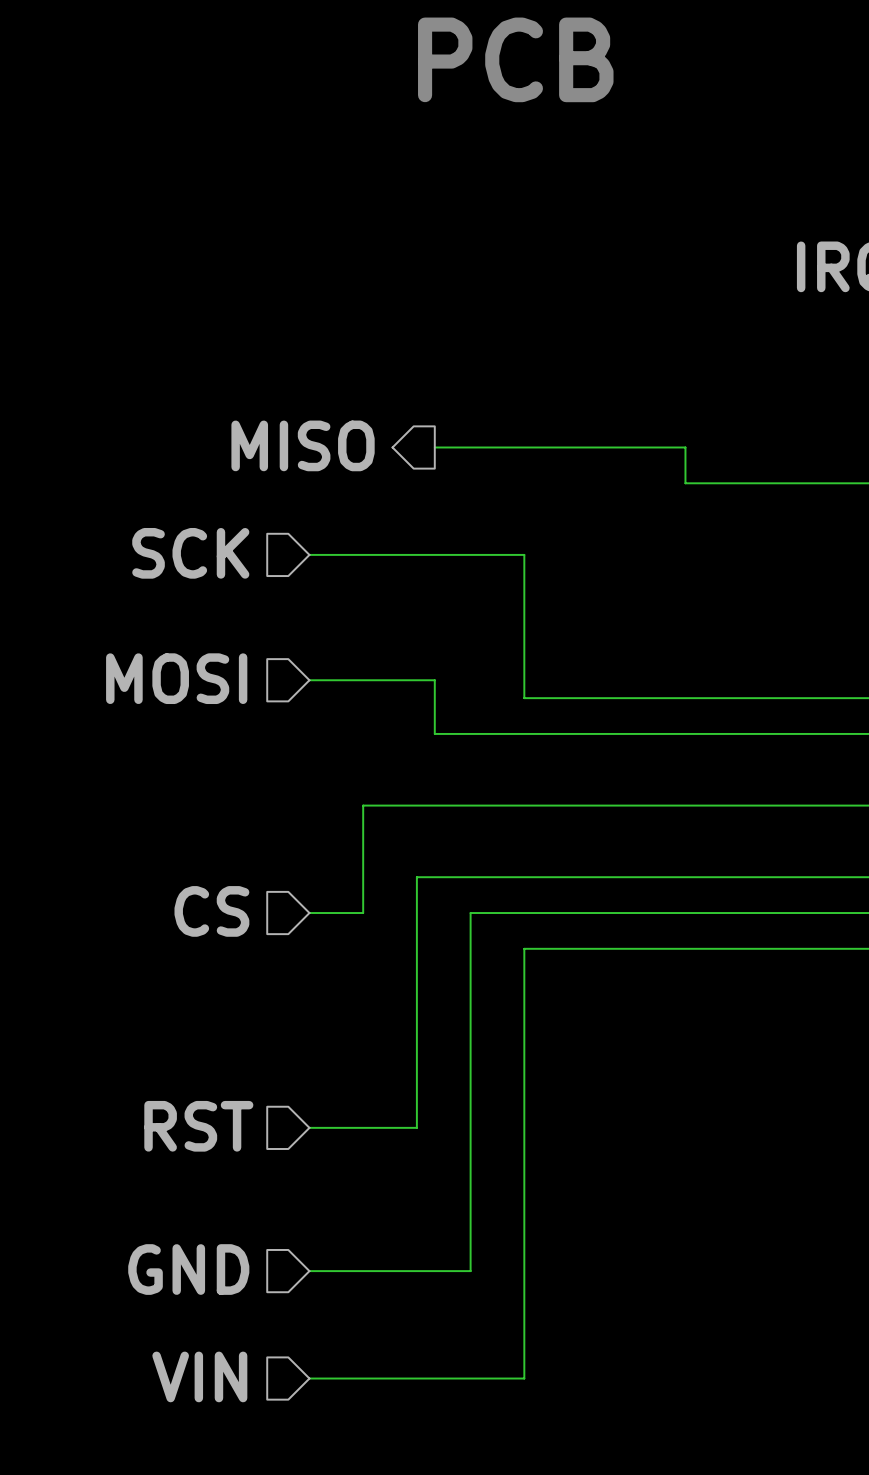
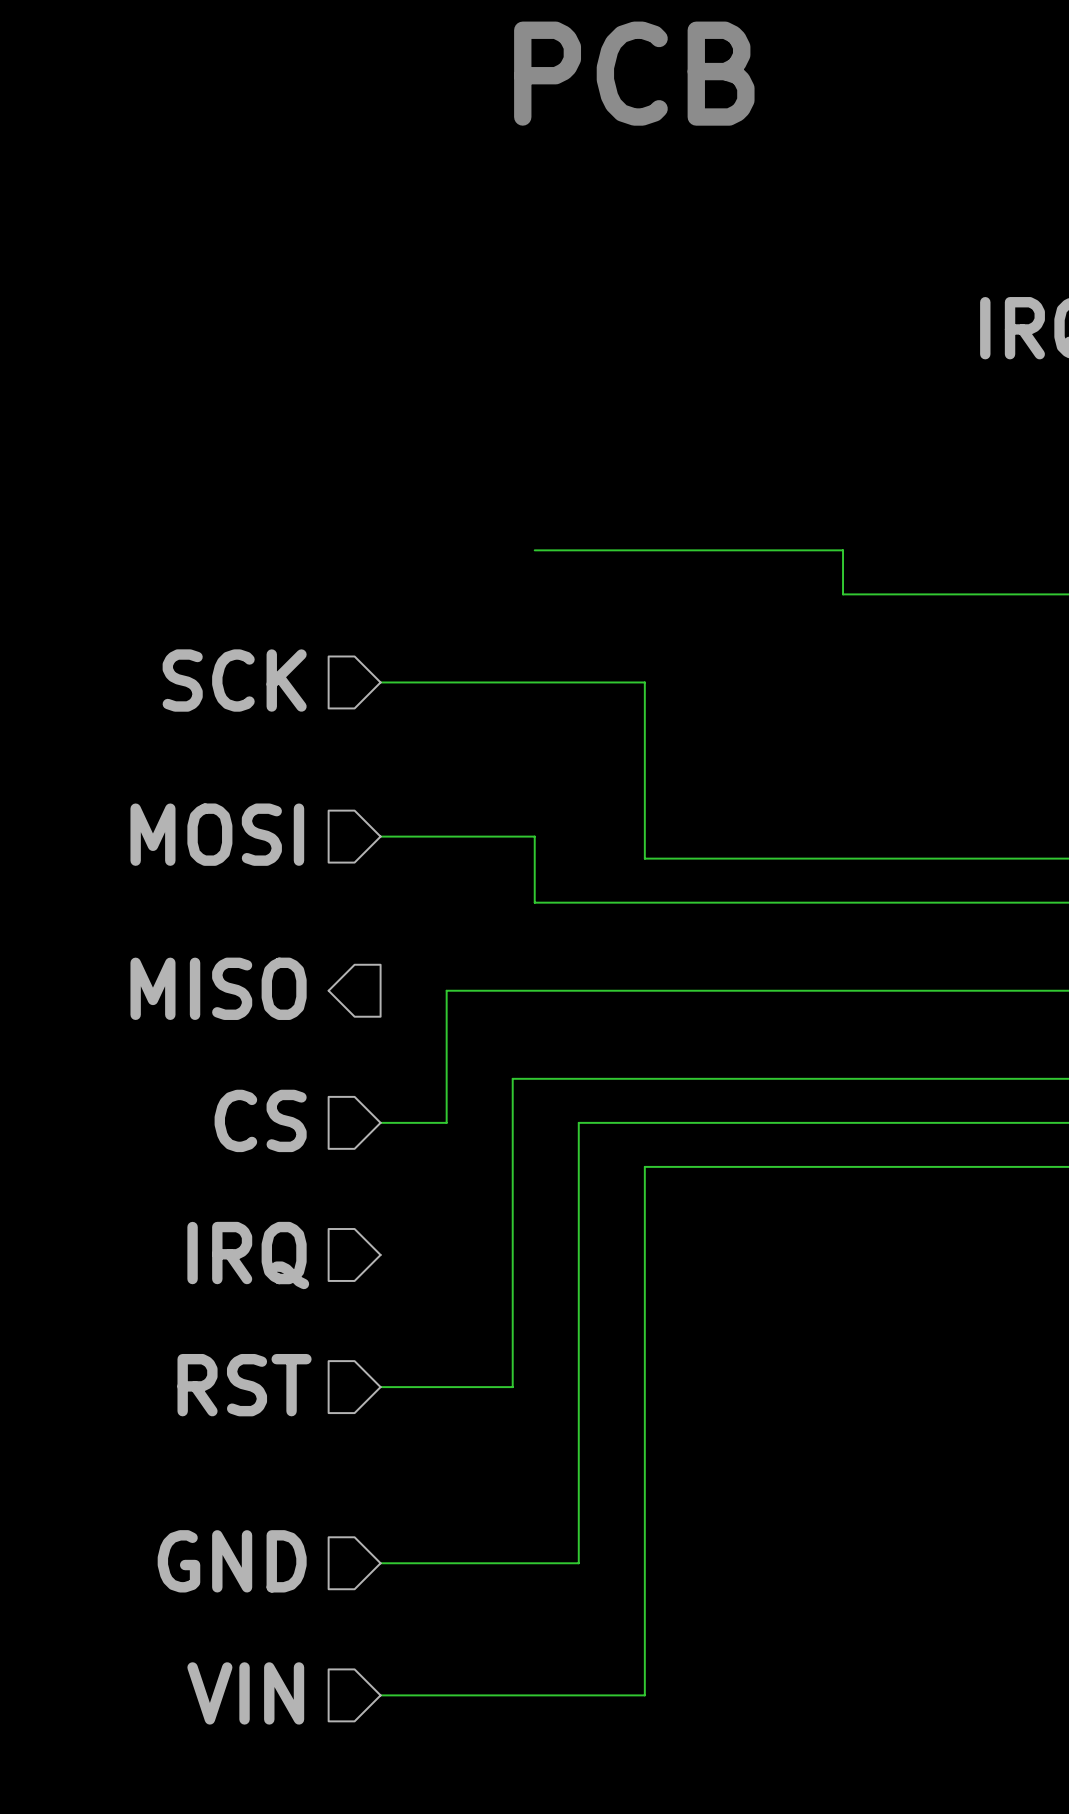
hierarchical label: MISO (303, 445) -> none
hierarchical label: none -> MISO (218, 988)
hierarchical label: none -> IRQ (248, 1255)

